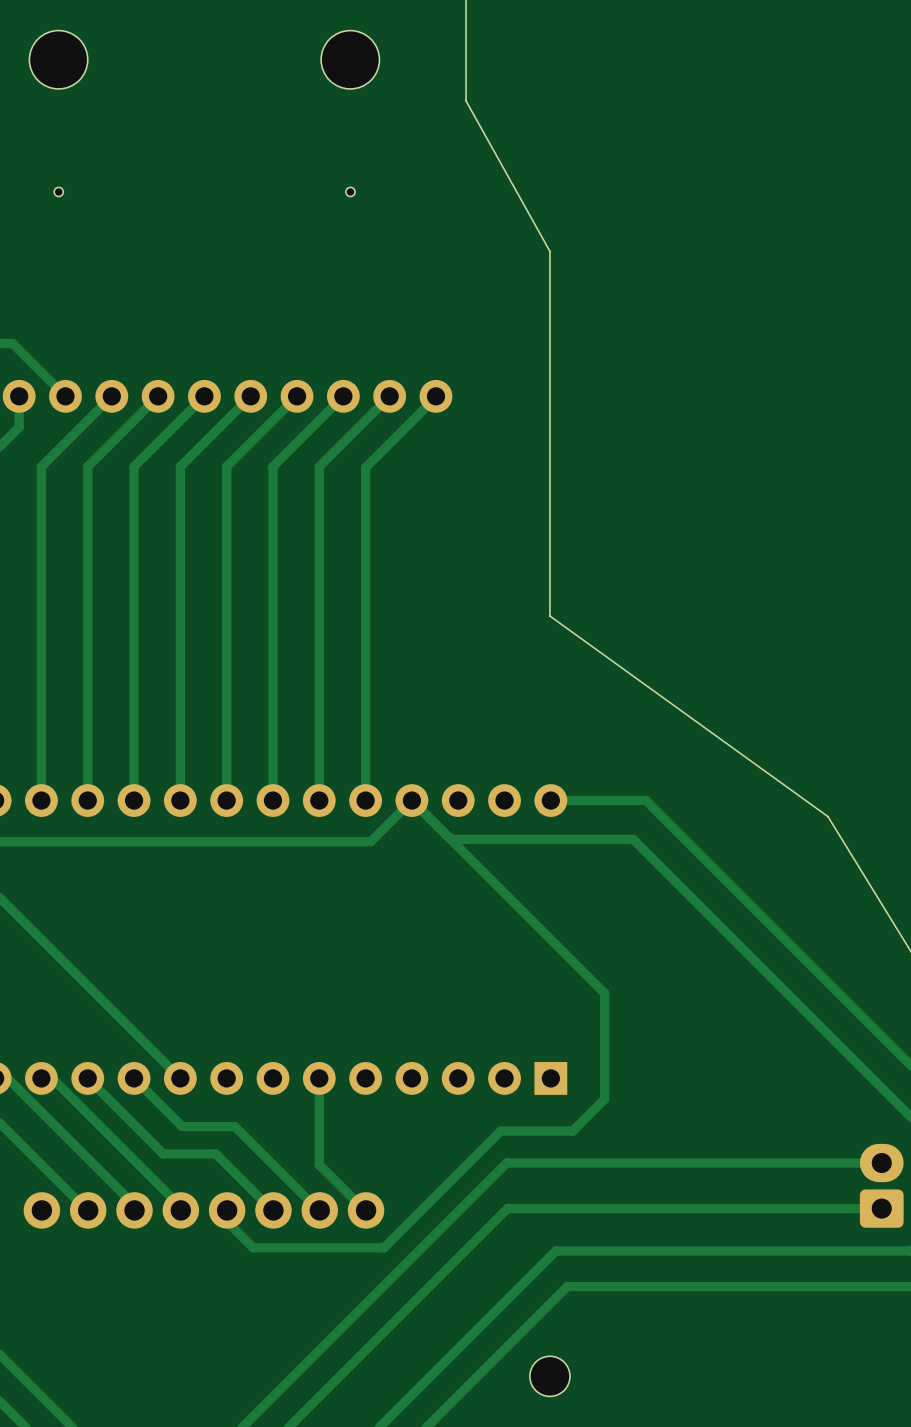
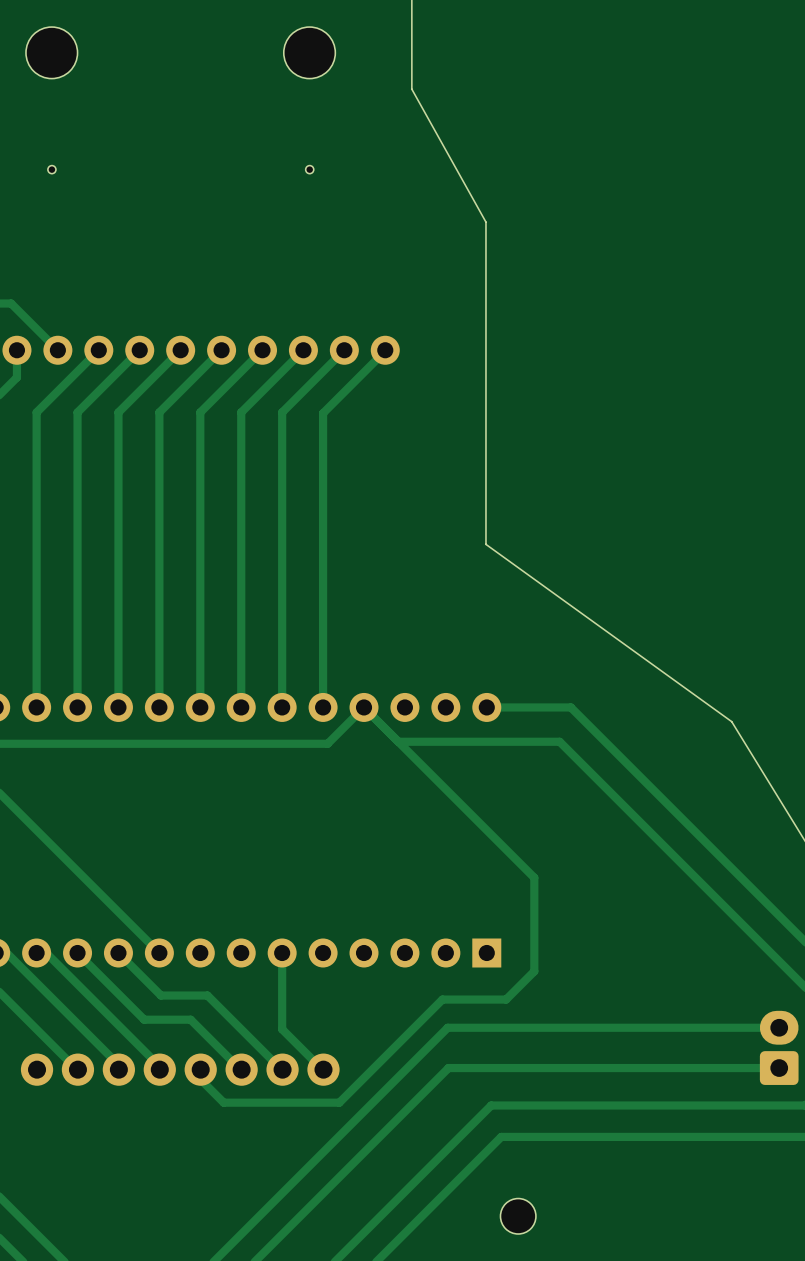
part position: (549, 1376) -> (518, 1216)

